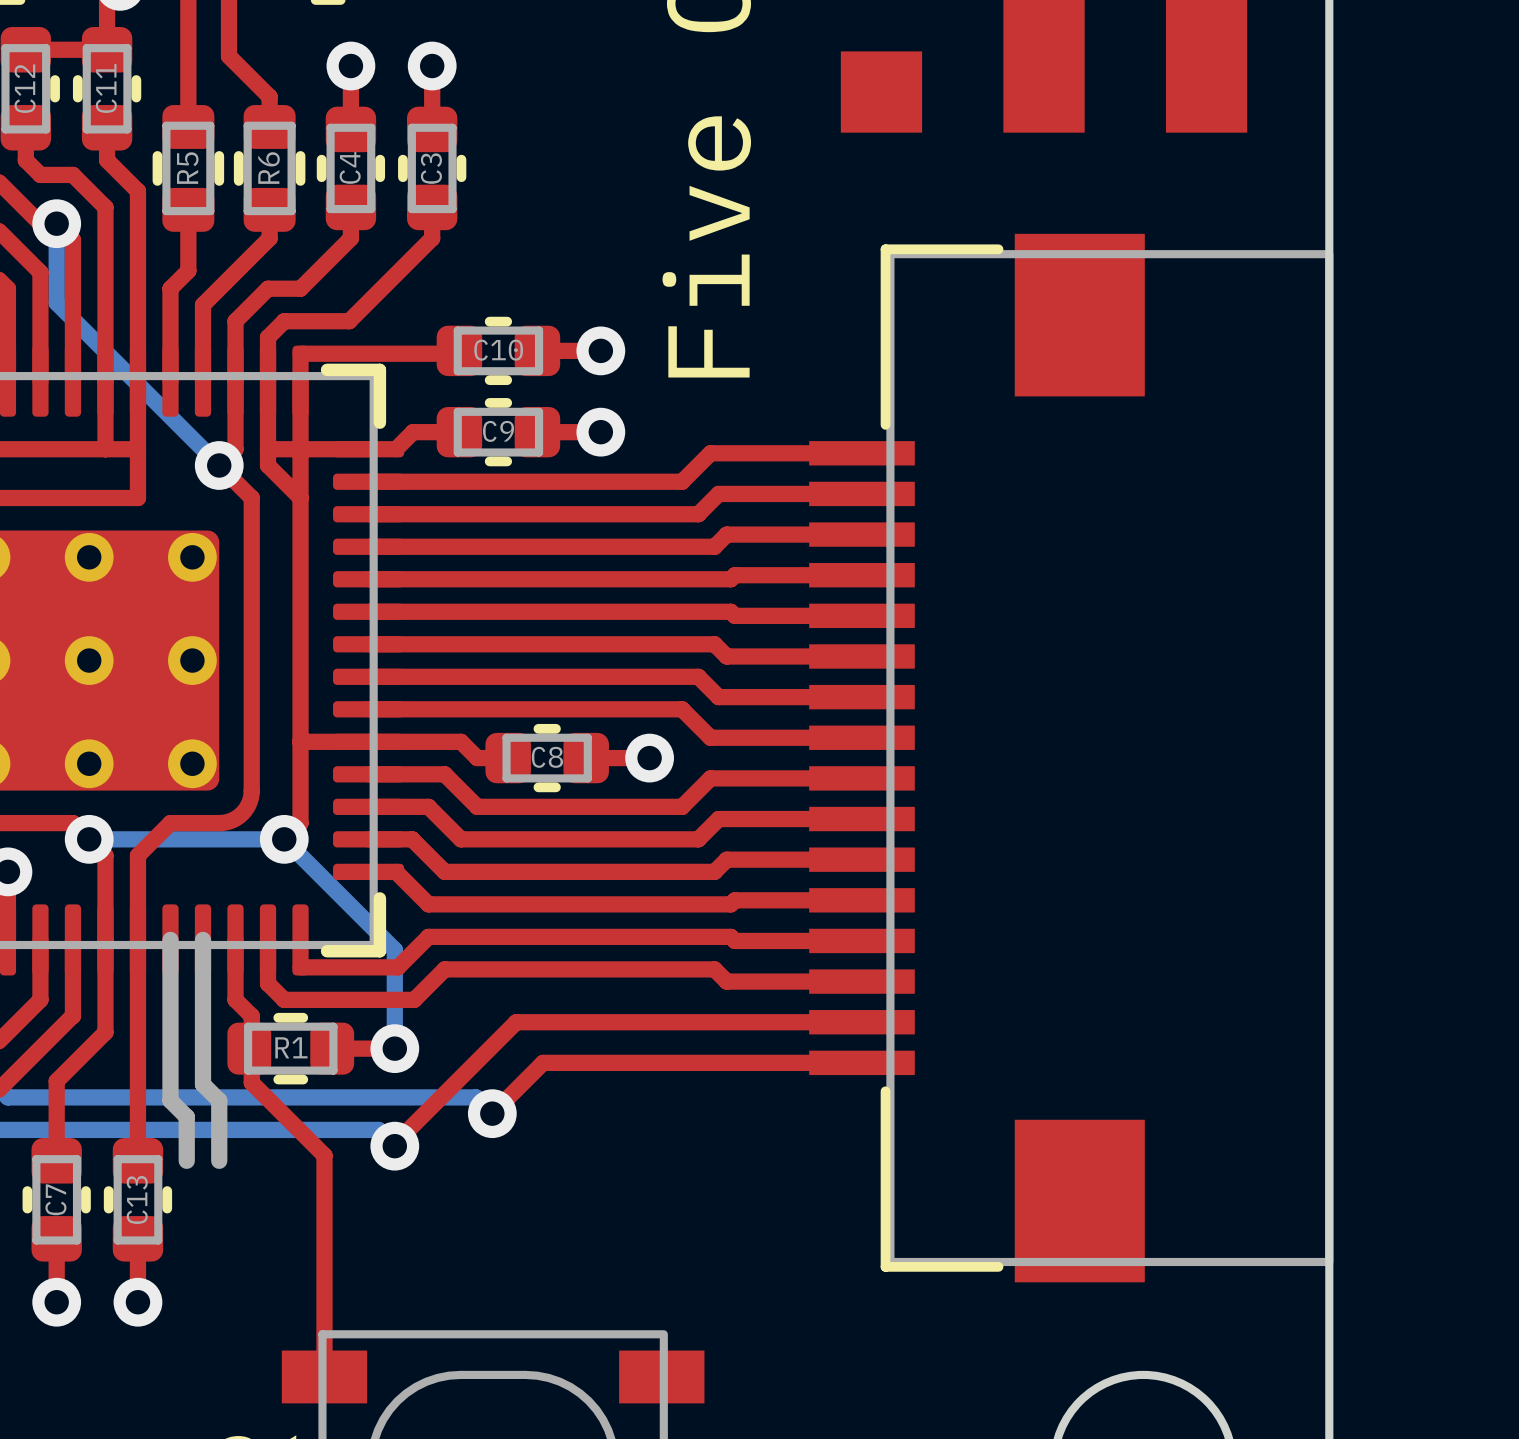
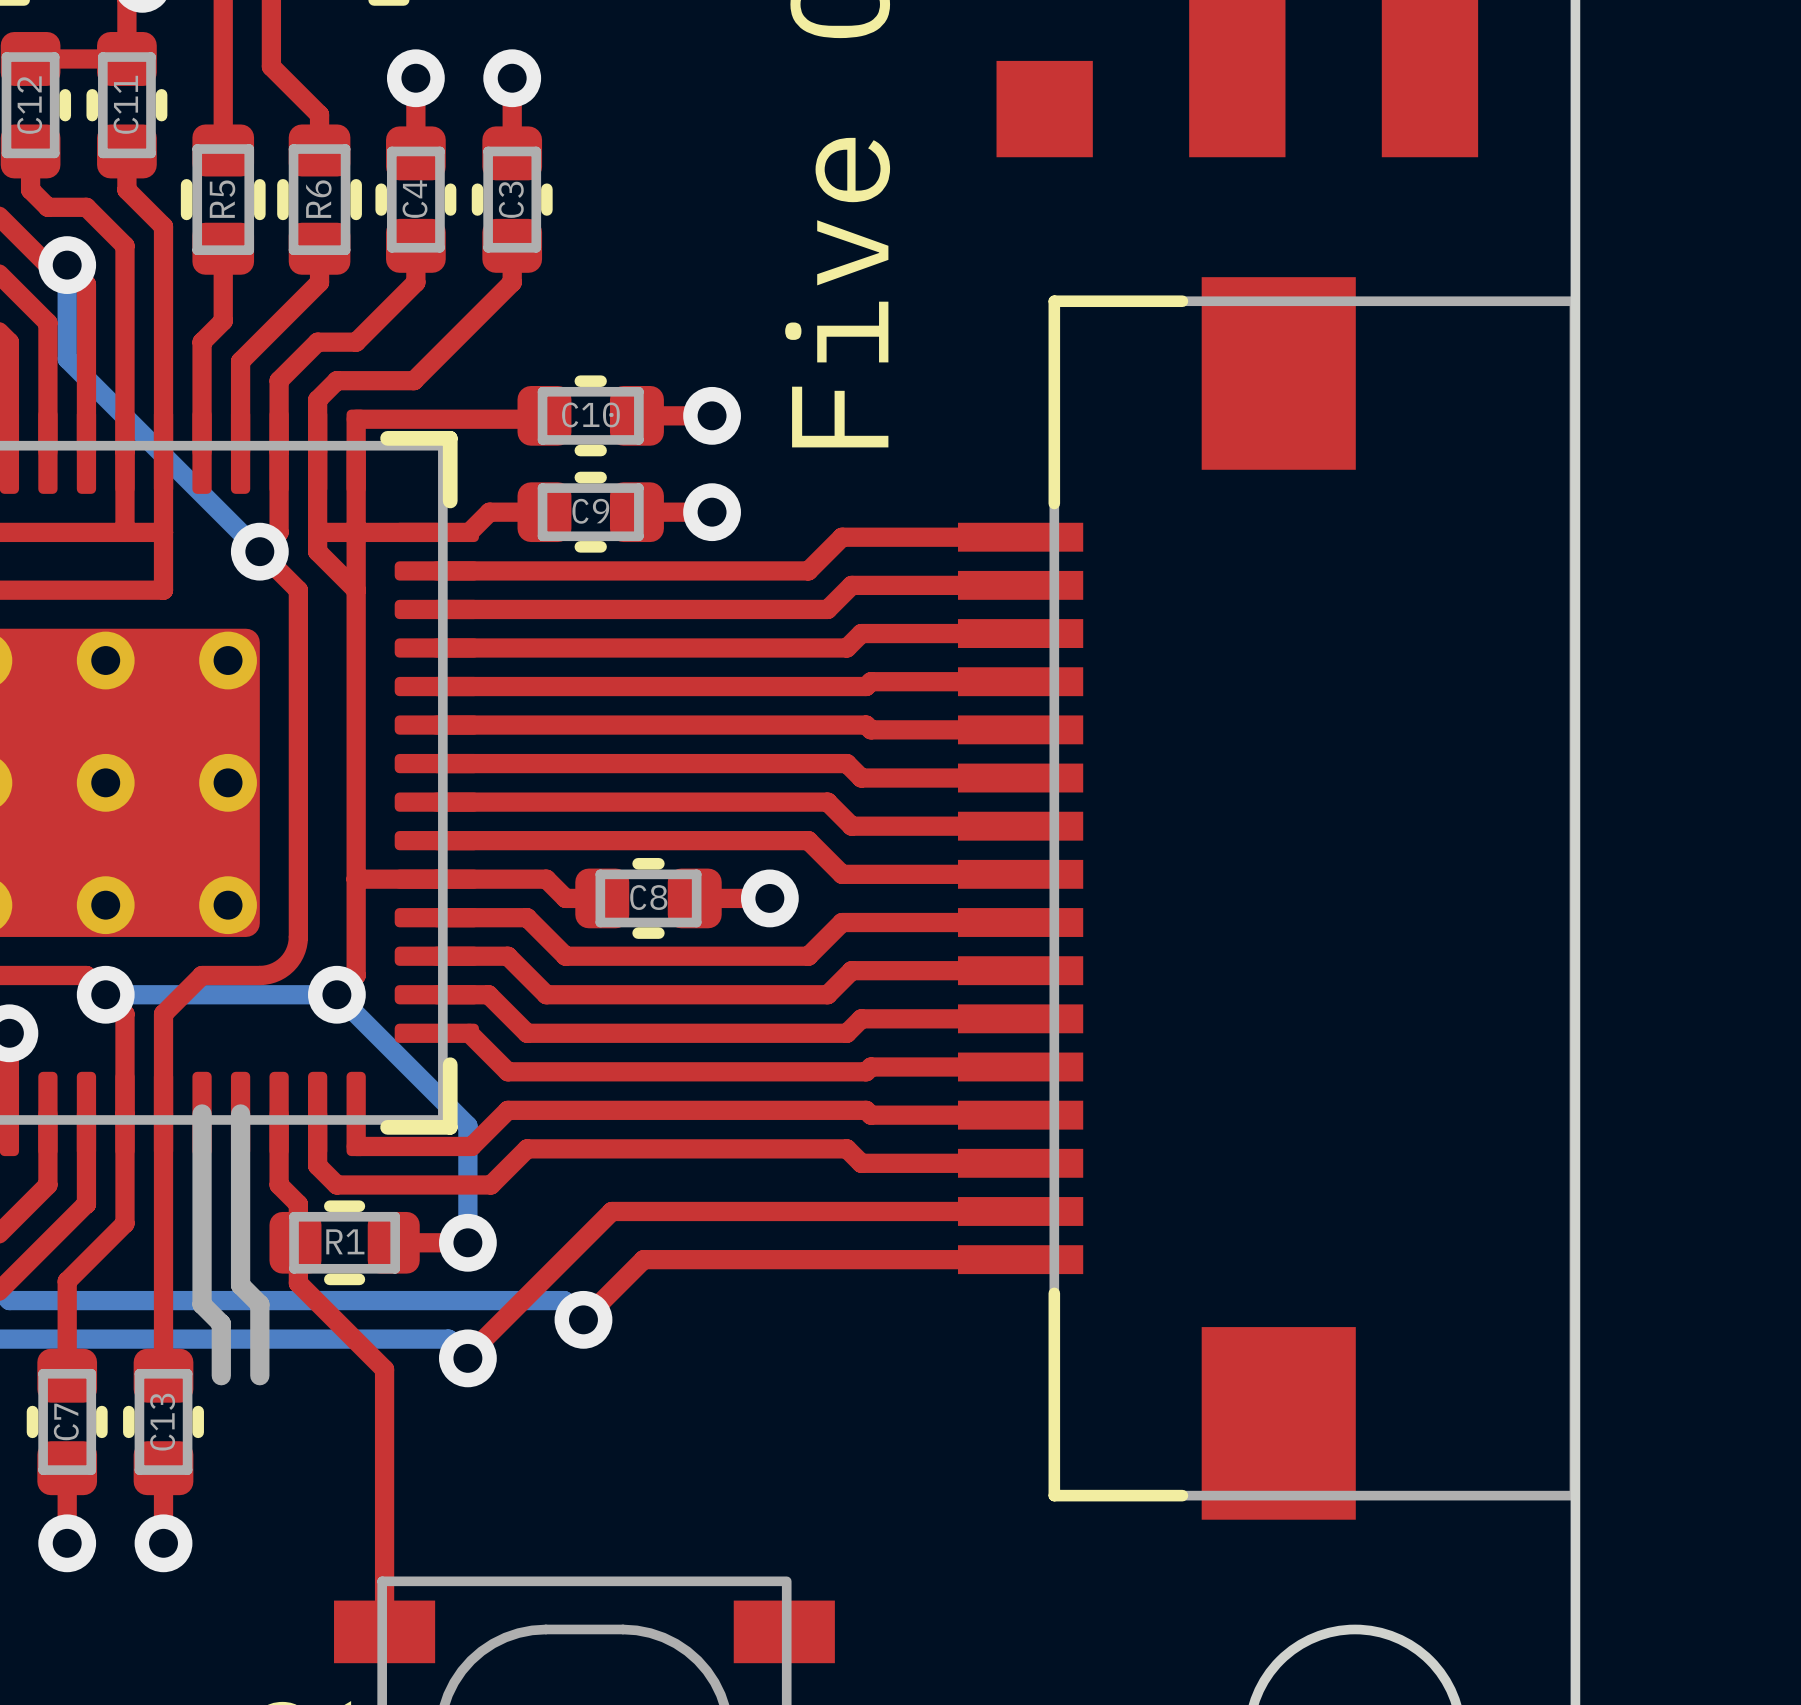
part footprint: [809, 233, 1334, 1283] -> [957, 277, 1580, 1520]

